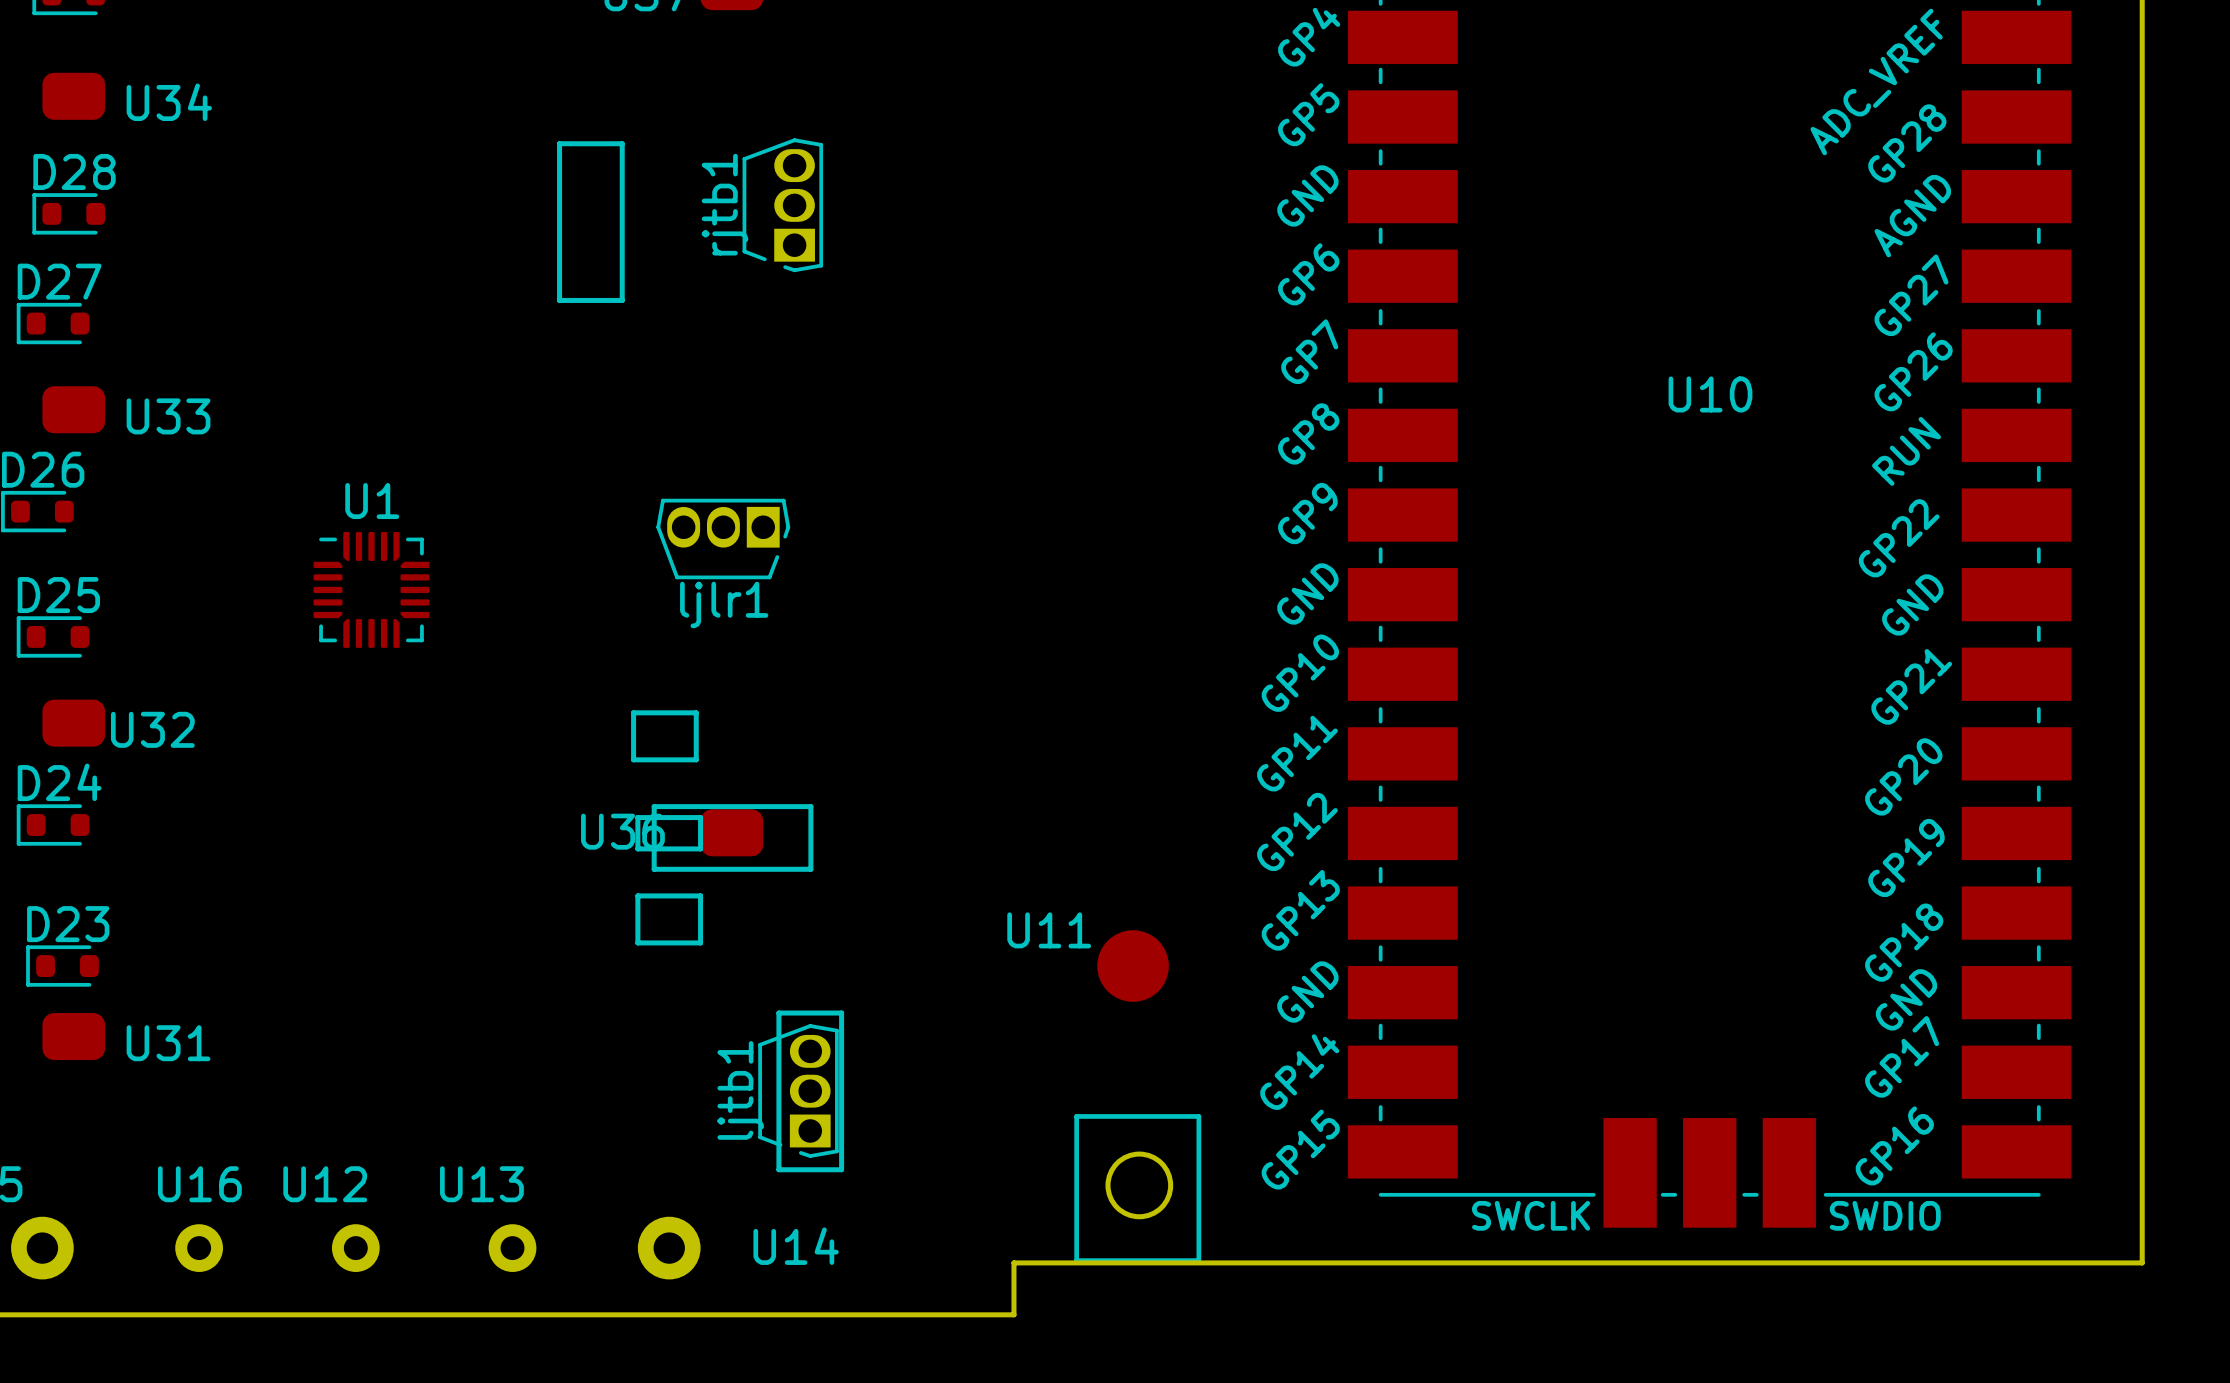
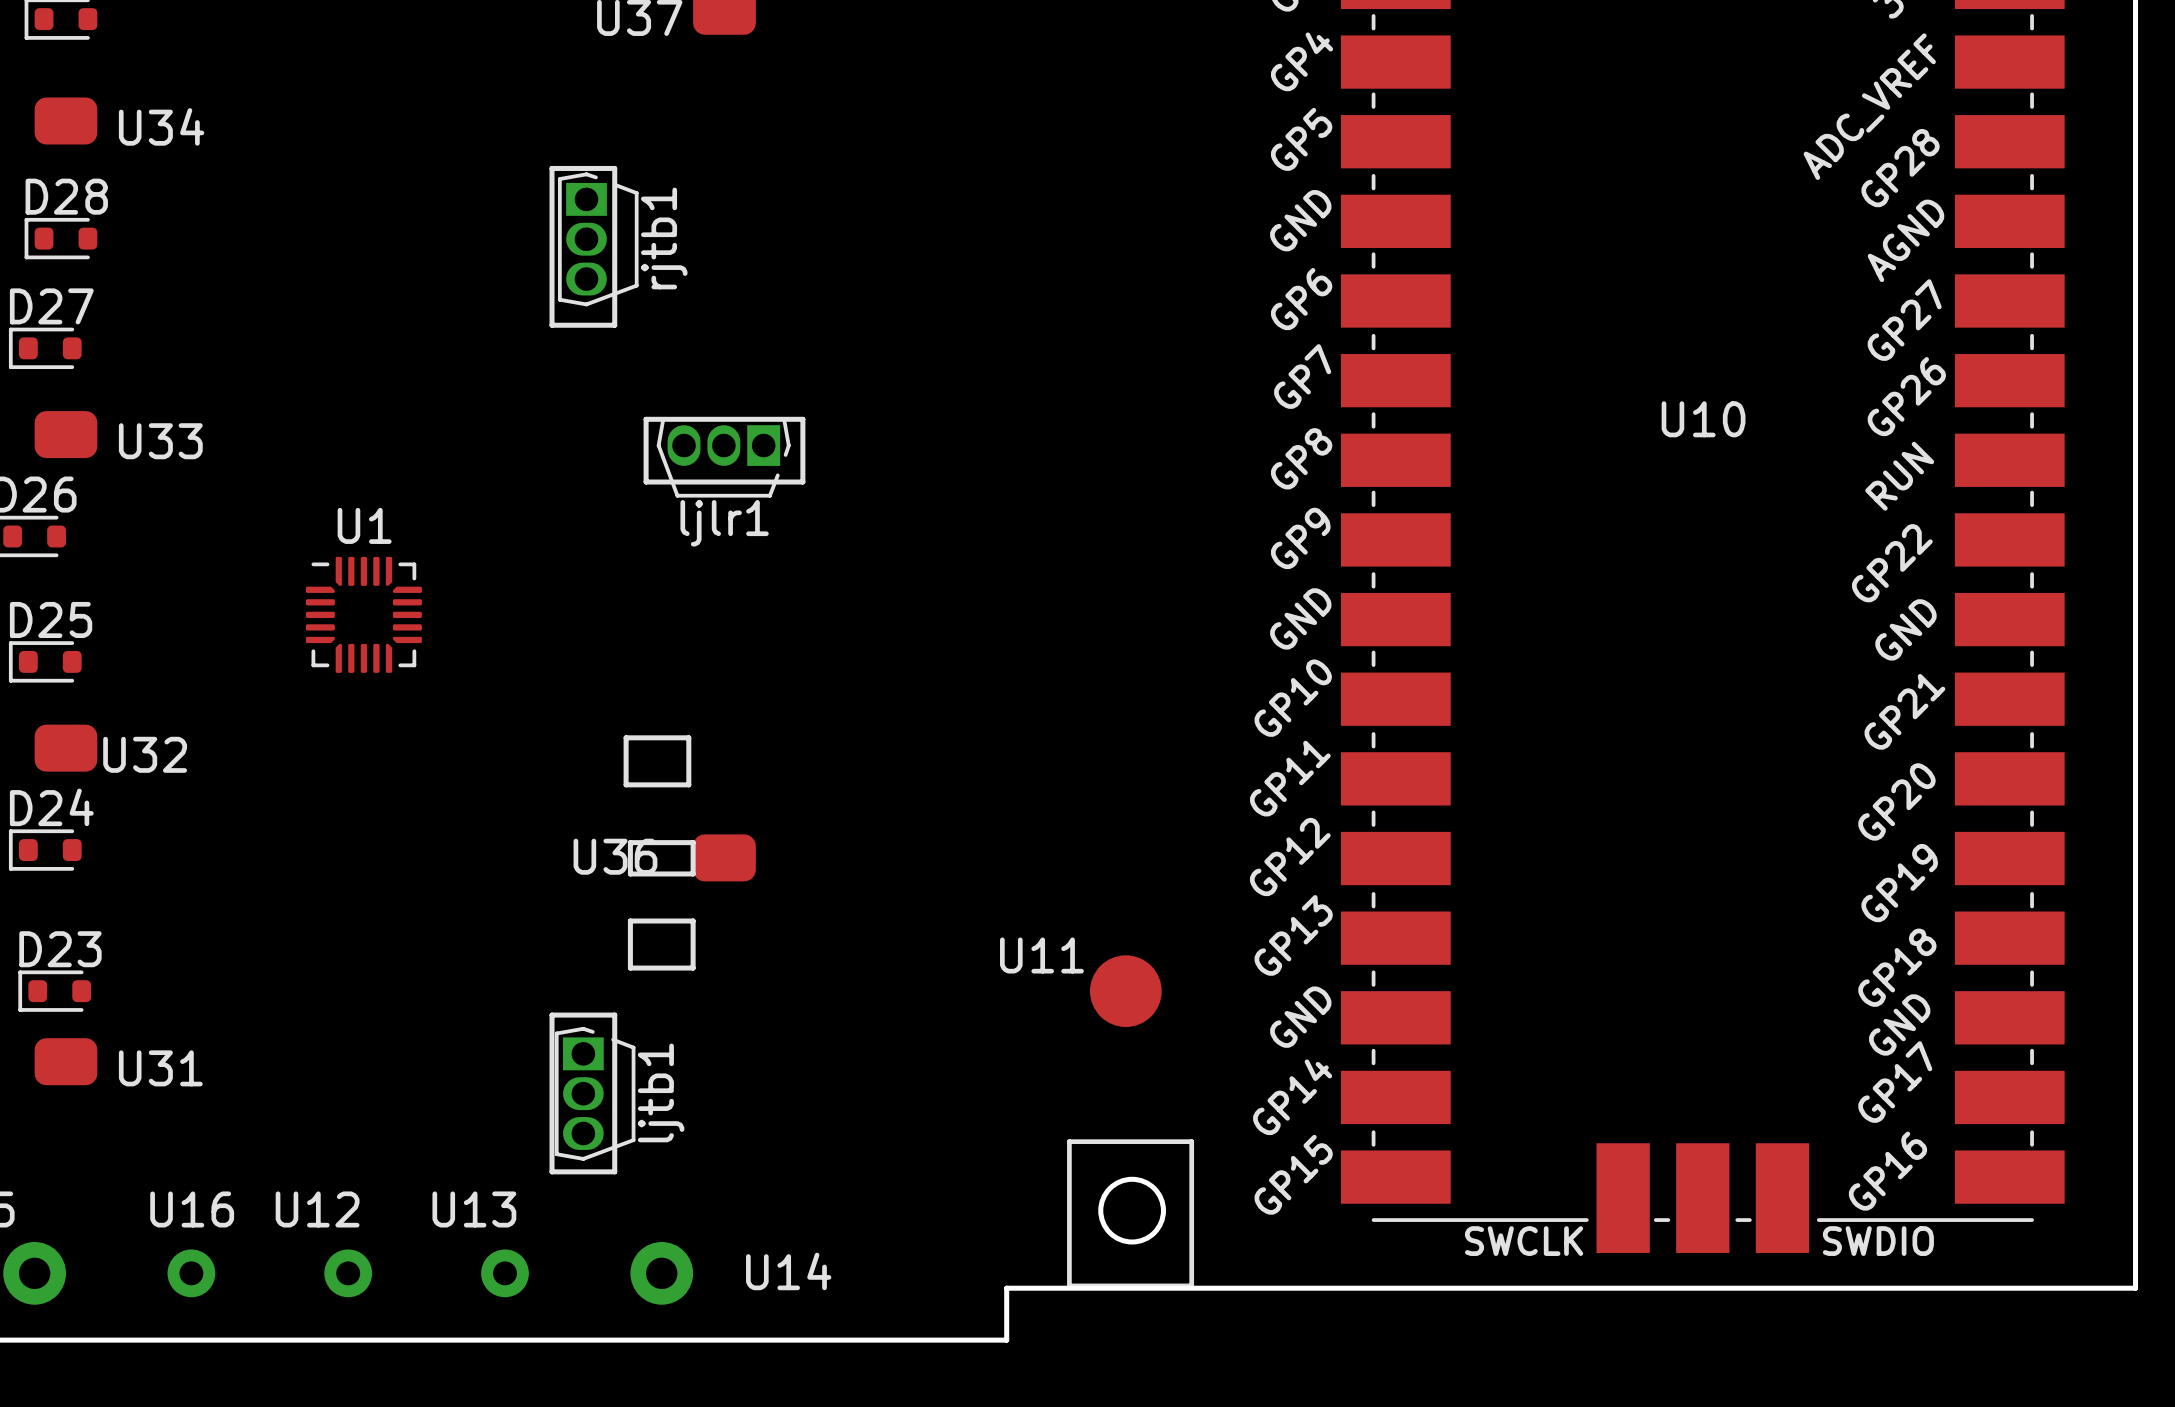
rjtb1 rotation: 0° (782, 205) -> 180° (598, 239)
rjtb1 position: (782, 205) -> (598, 239)
ljlr1 position: (723, 539) -> (723, 457)
line: (654, 806) (810, 806) (810, 869) (654, 869) (654, 806) -> (646, 419) (802, 419) (802, 482) (646, 482) (646, 419)
line: (778, 1013) (778, 1169) (841, 1169) (841, 1013) (778, 1013) -> (552, 1015) (552, 1171) (614, 1171) (614, 1015) (552, 1015)
ljtb1 rotation: 0° (798, 1091) -> 180° (595, 1093)
ljtb1 position: (798, 1091) -> (595, 1093)

